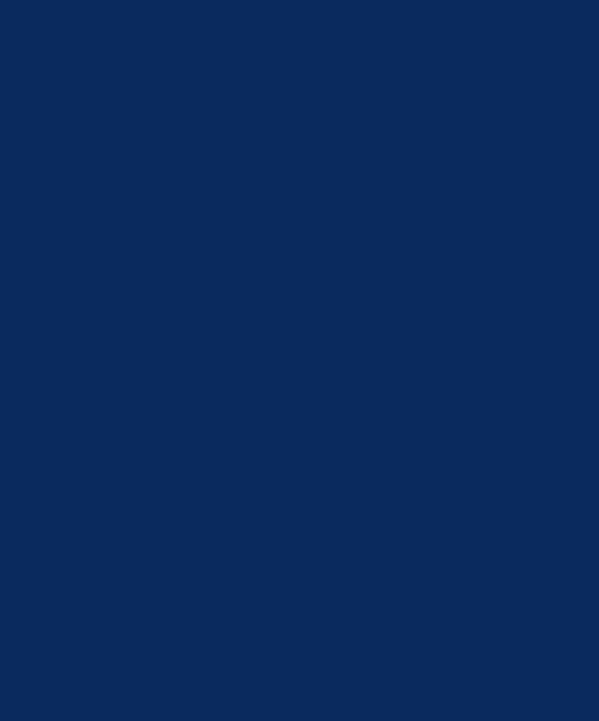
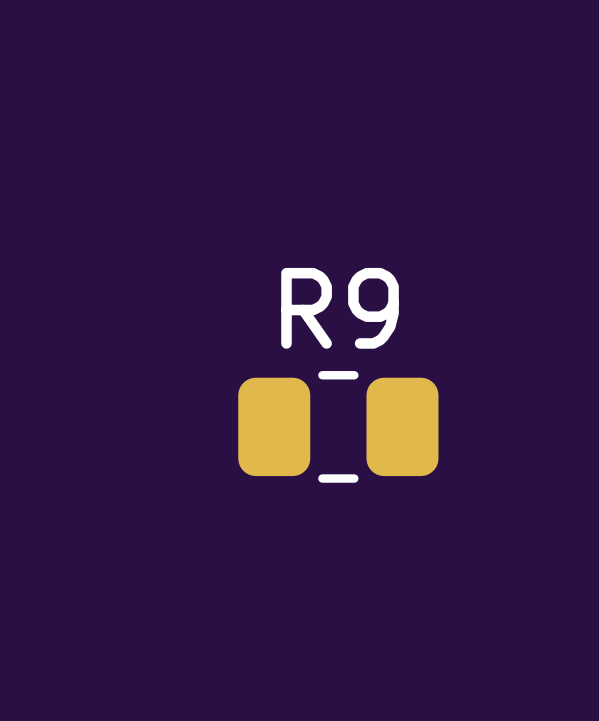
R9: none -> (338, 426)

